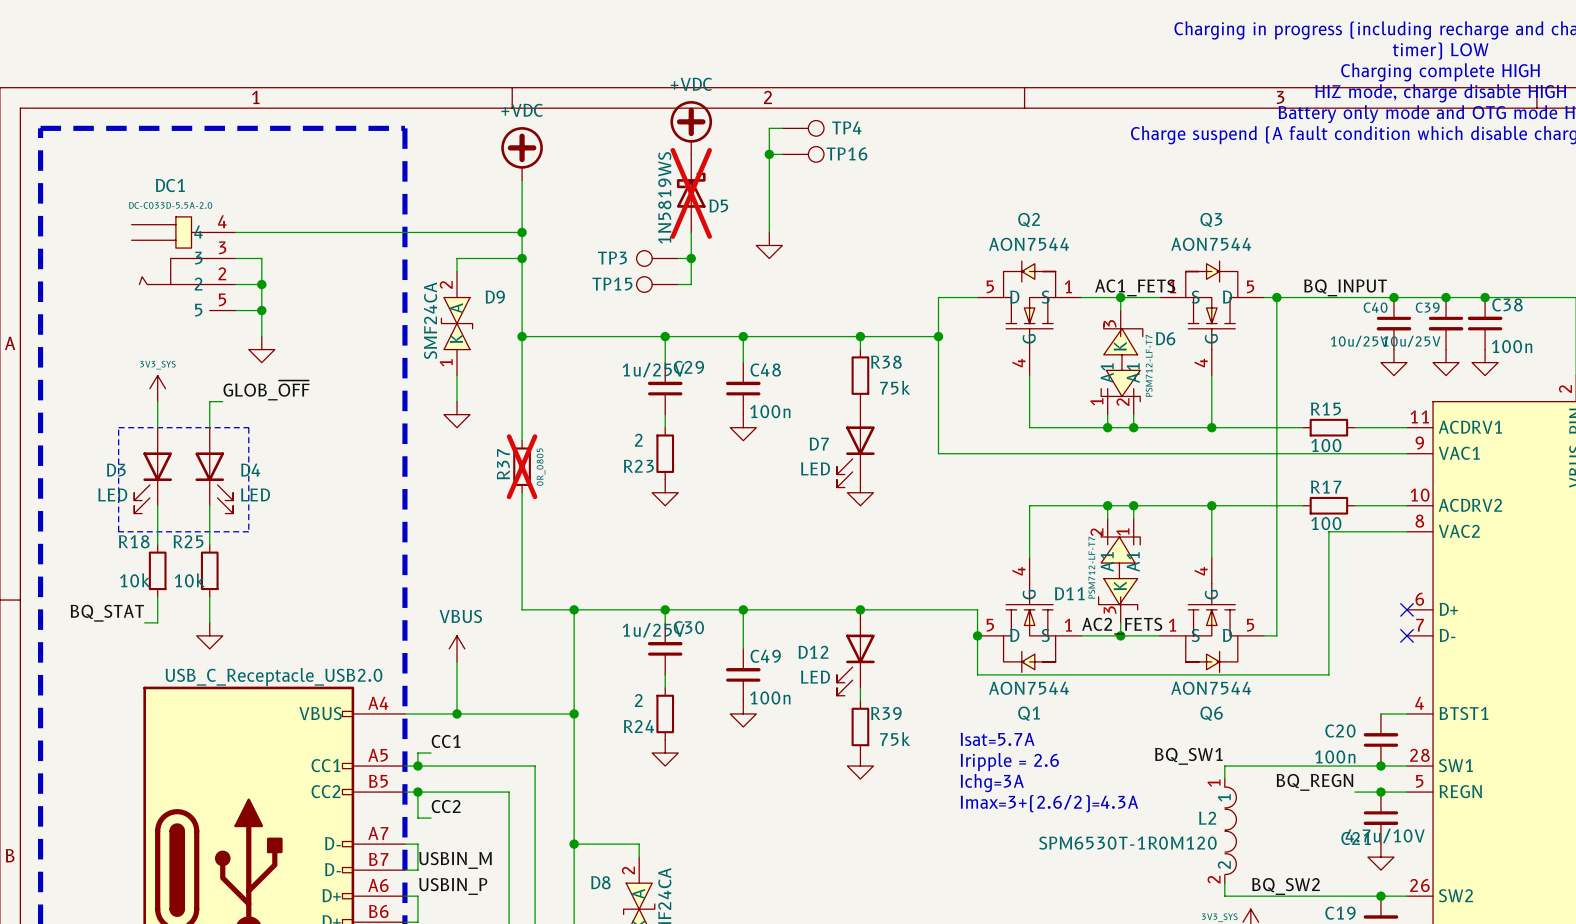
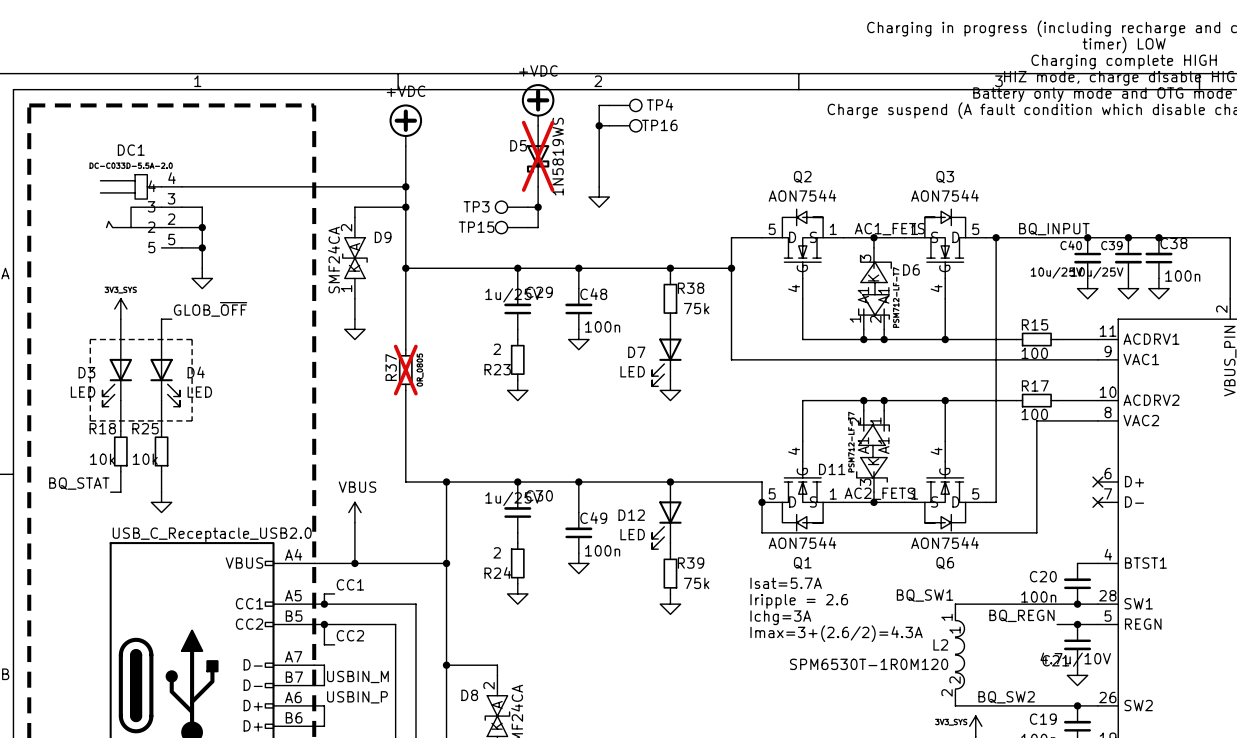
D5 rotation: 0° (691, 190) -> 180° (538, 158)

